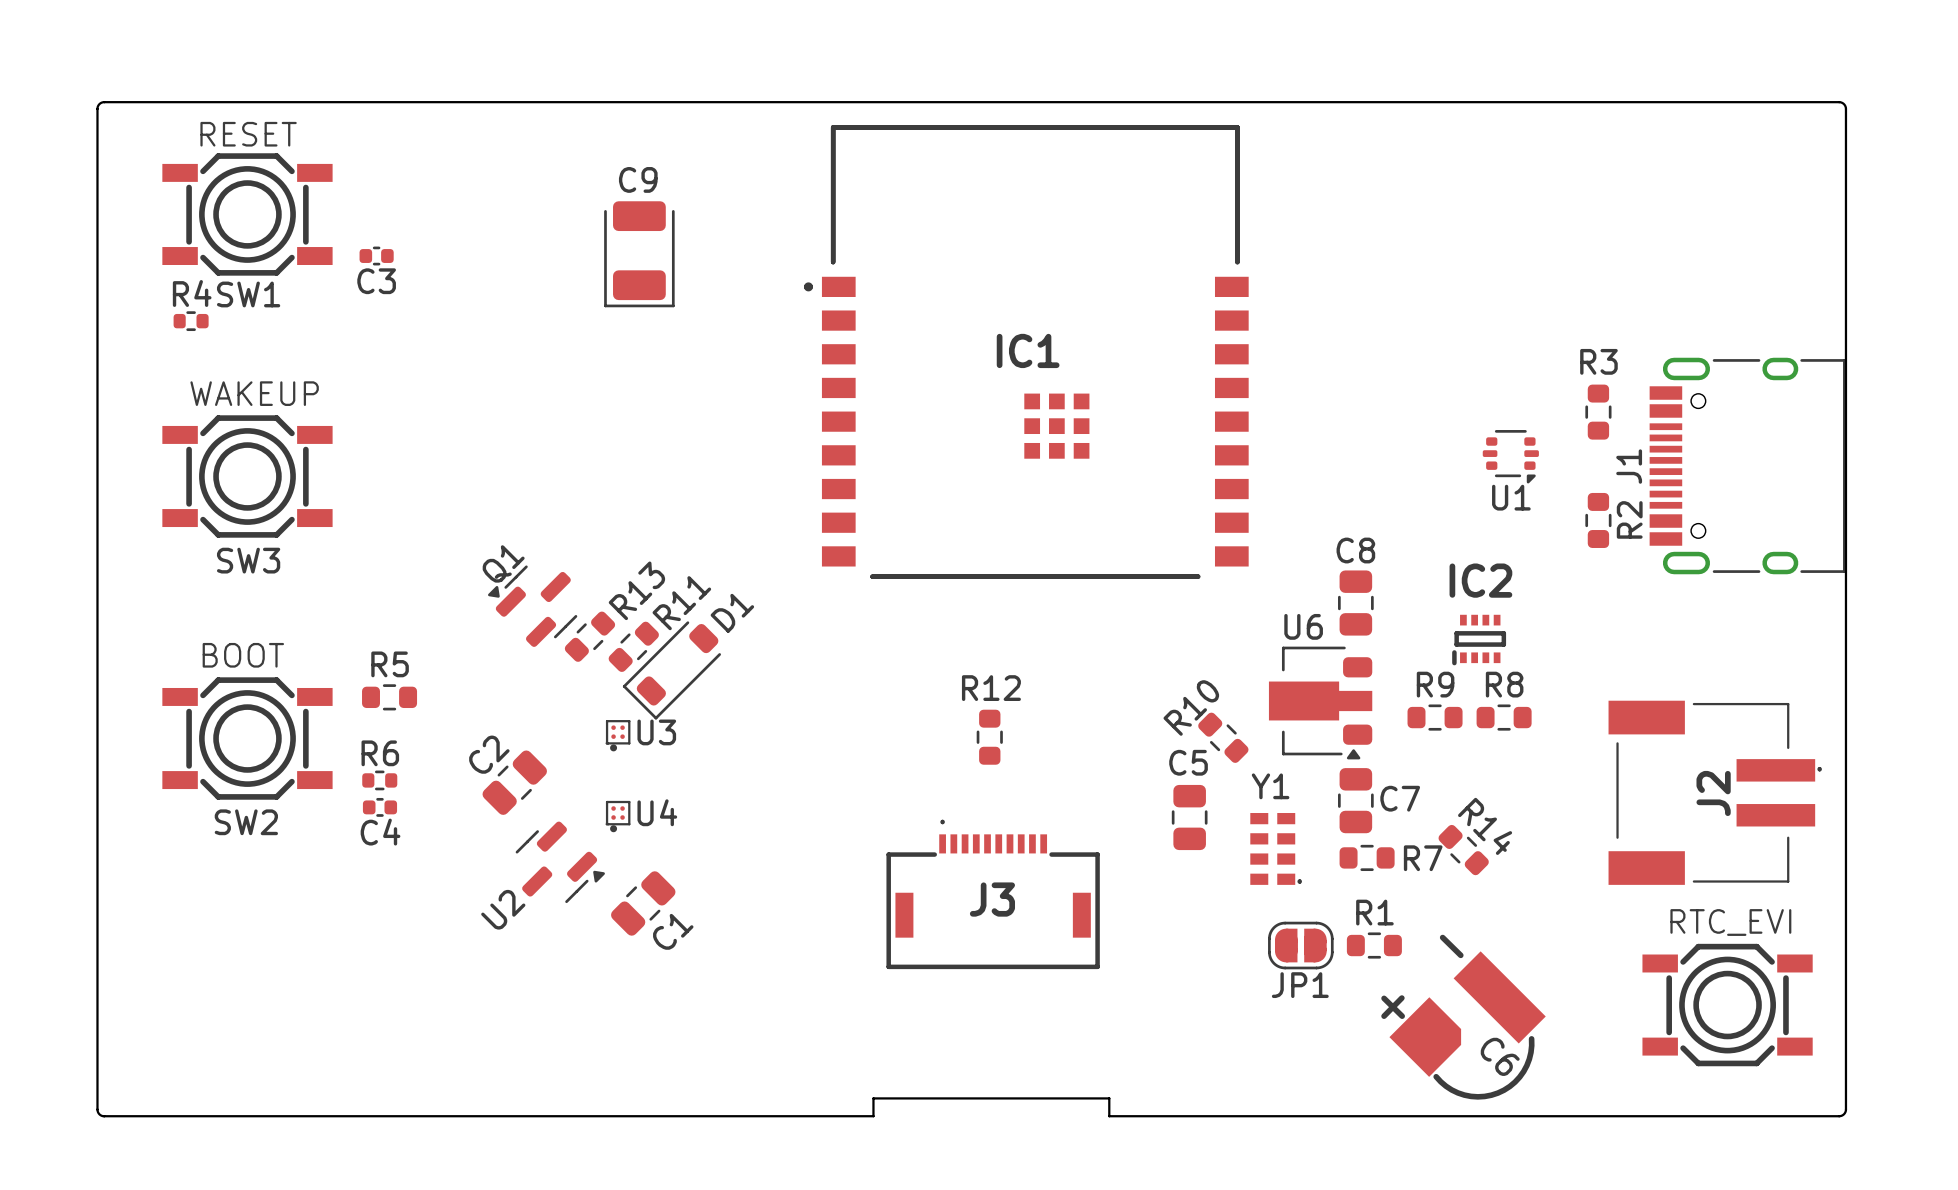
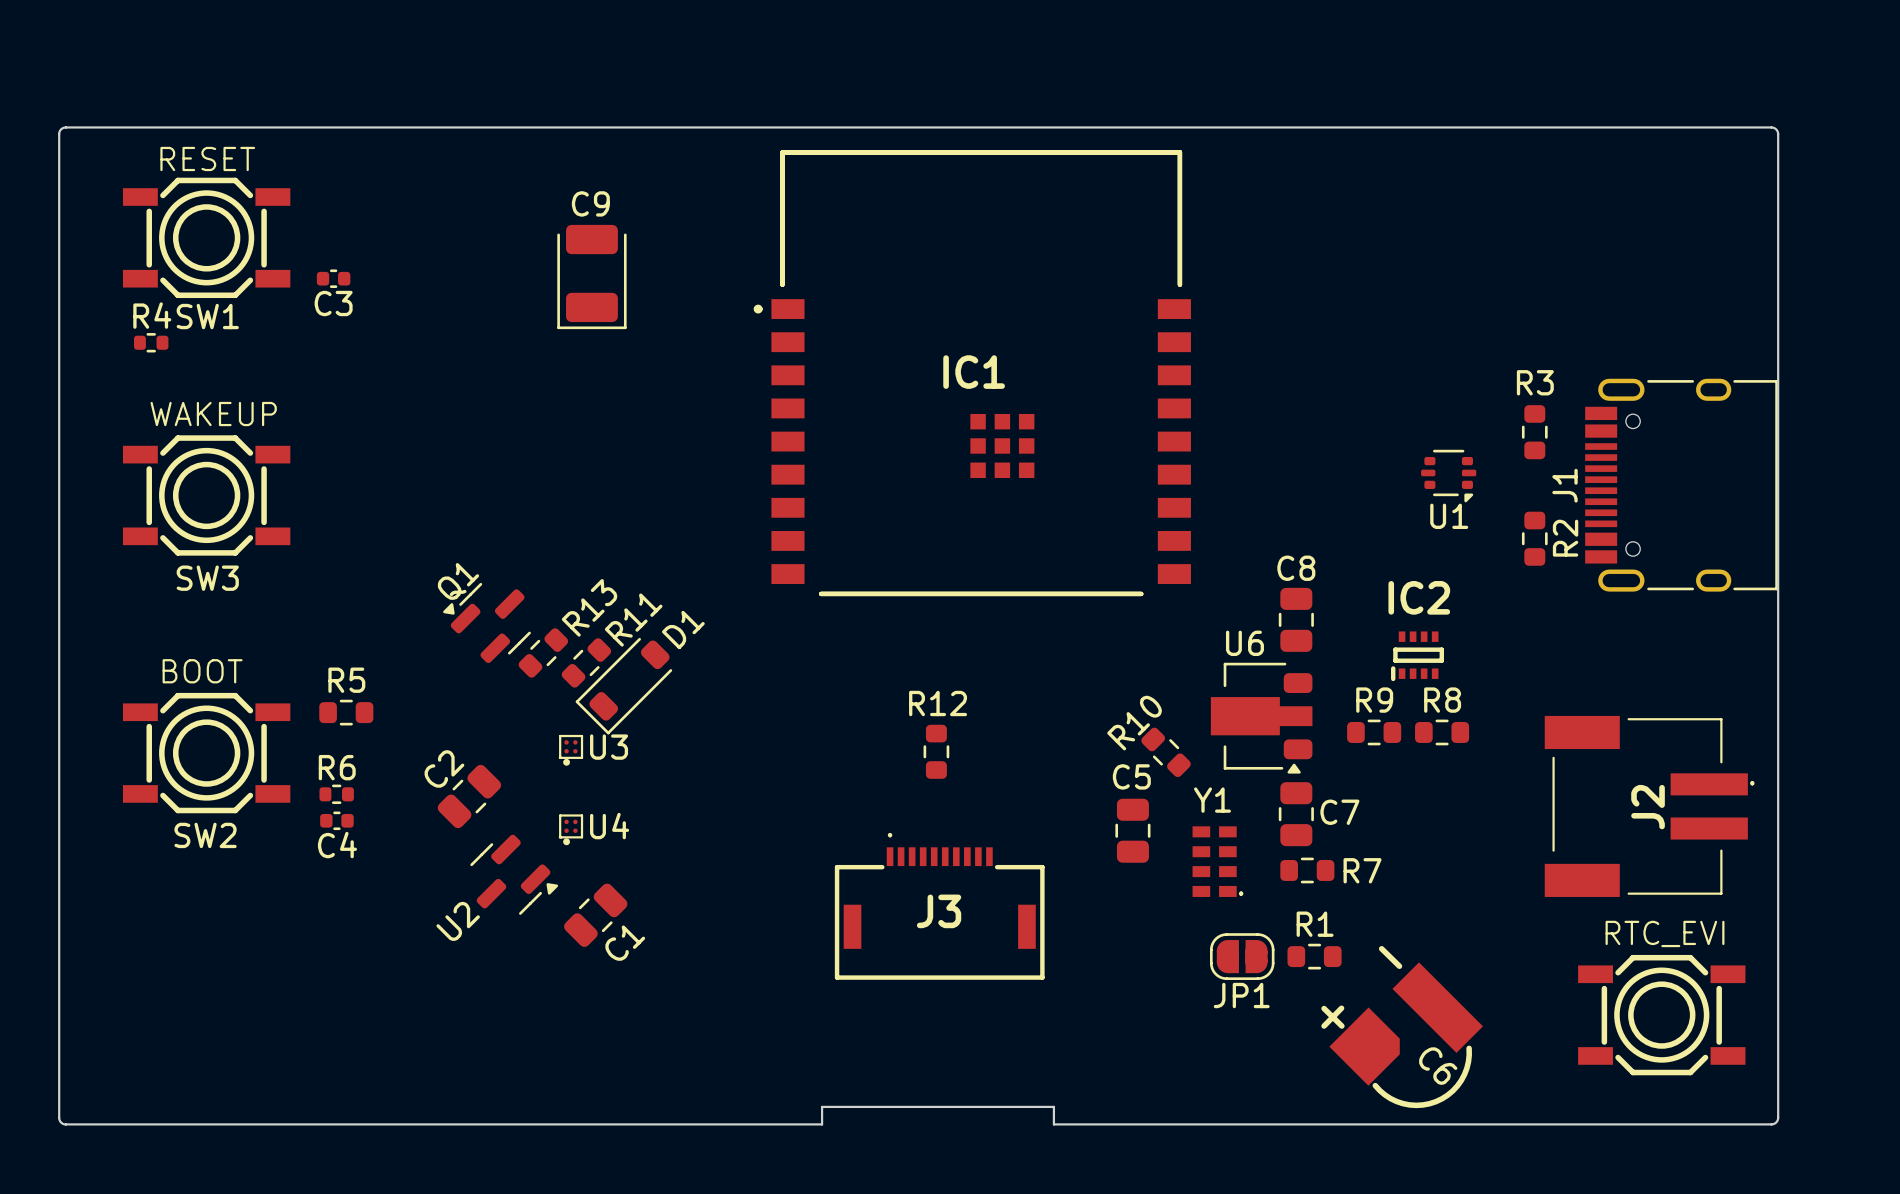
R14: (1463, 850) -> none

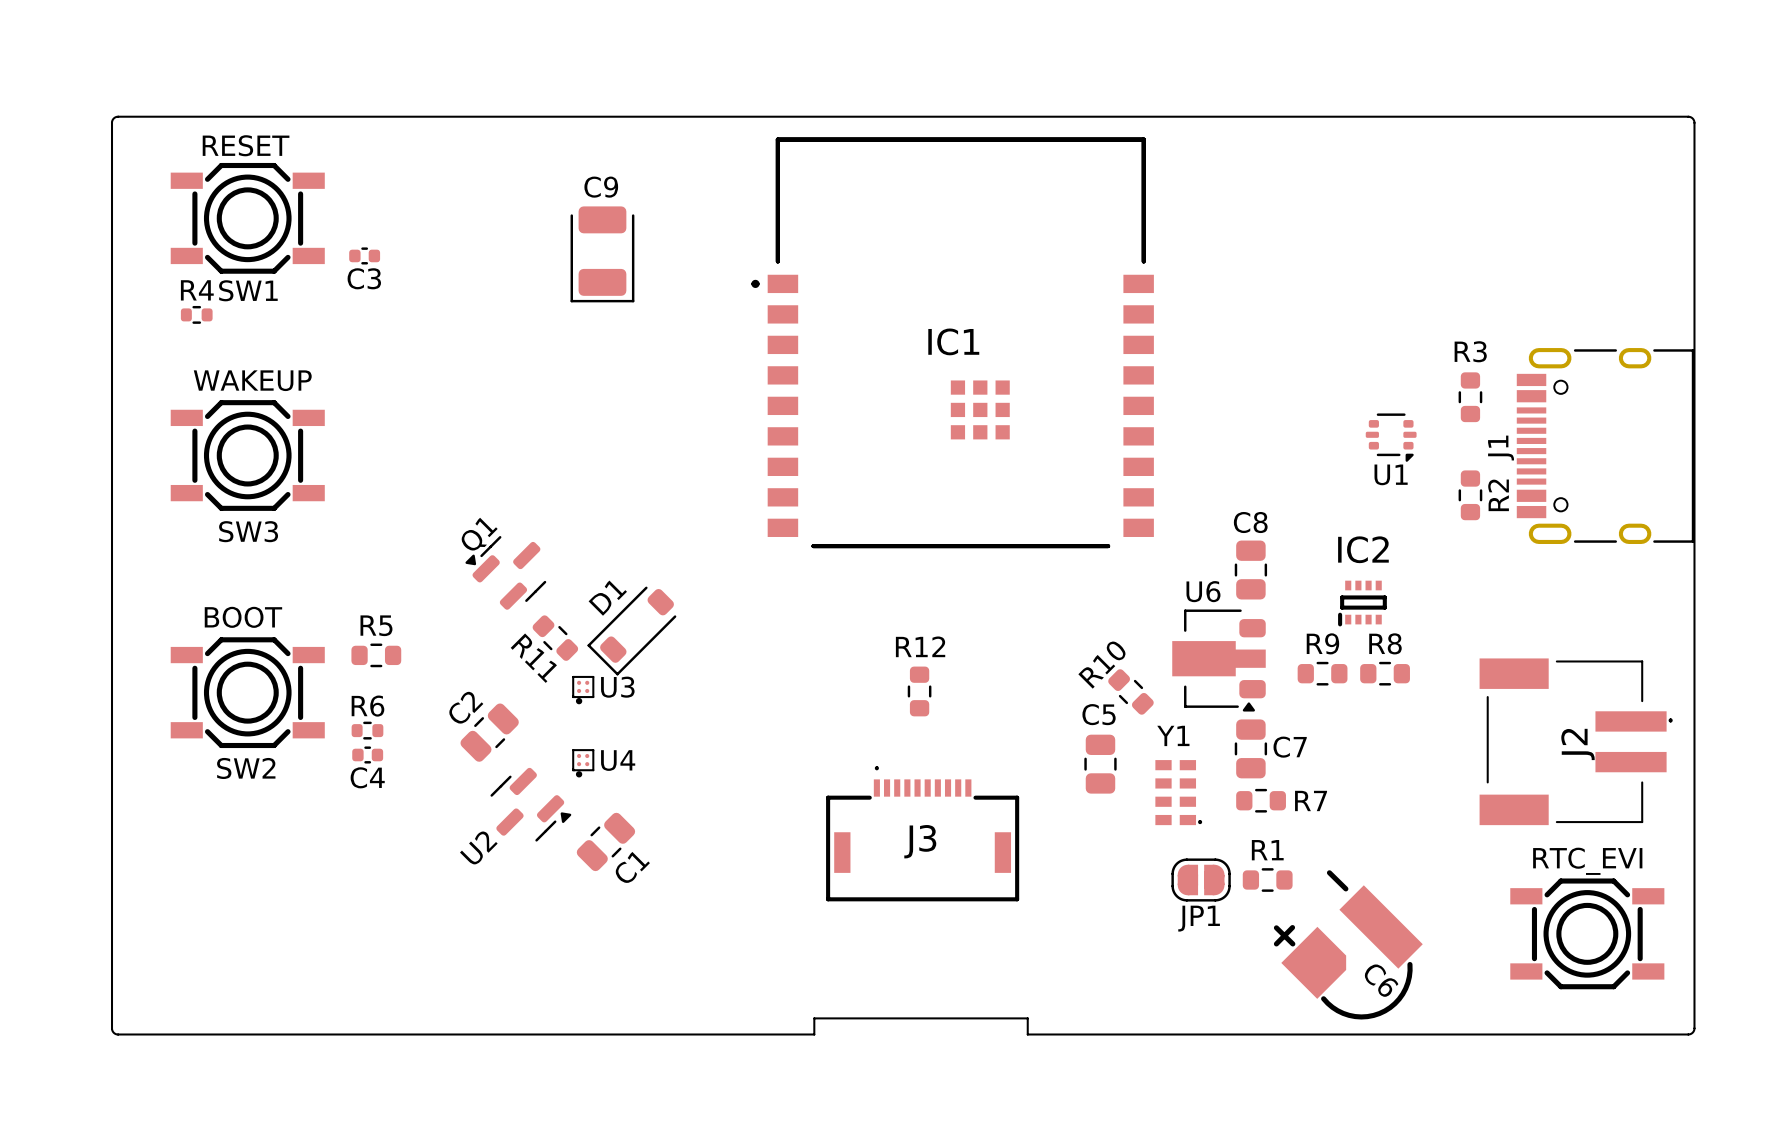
R11 name position: R11 (633, 620) -> R11 (533, 658)
D1 name position: D1 (683, 629) -> D1 (607, 598)
R13: (543, 652) -> none
R11 rotation: 0° (586, 662) -> 90° clockwise (555, 638)
R11 position: (586, 662) -> (555, 638)

